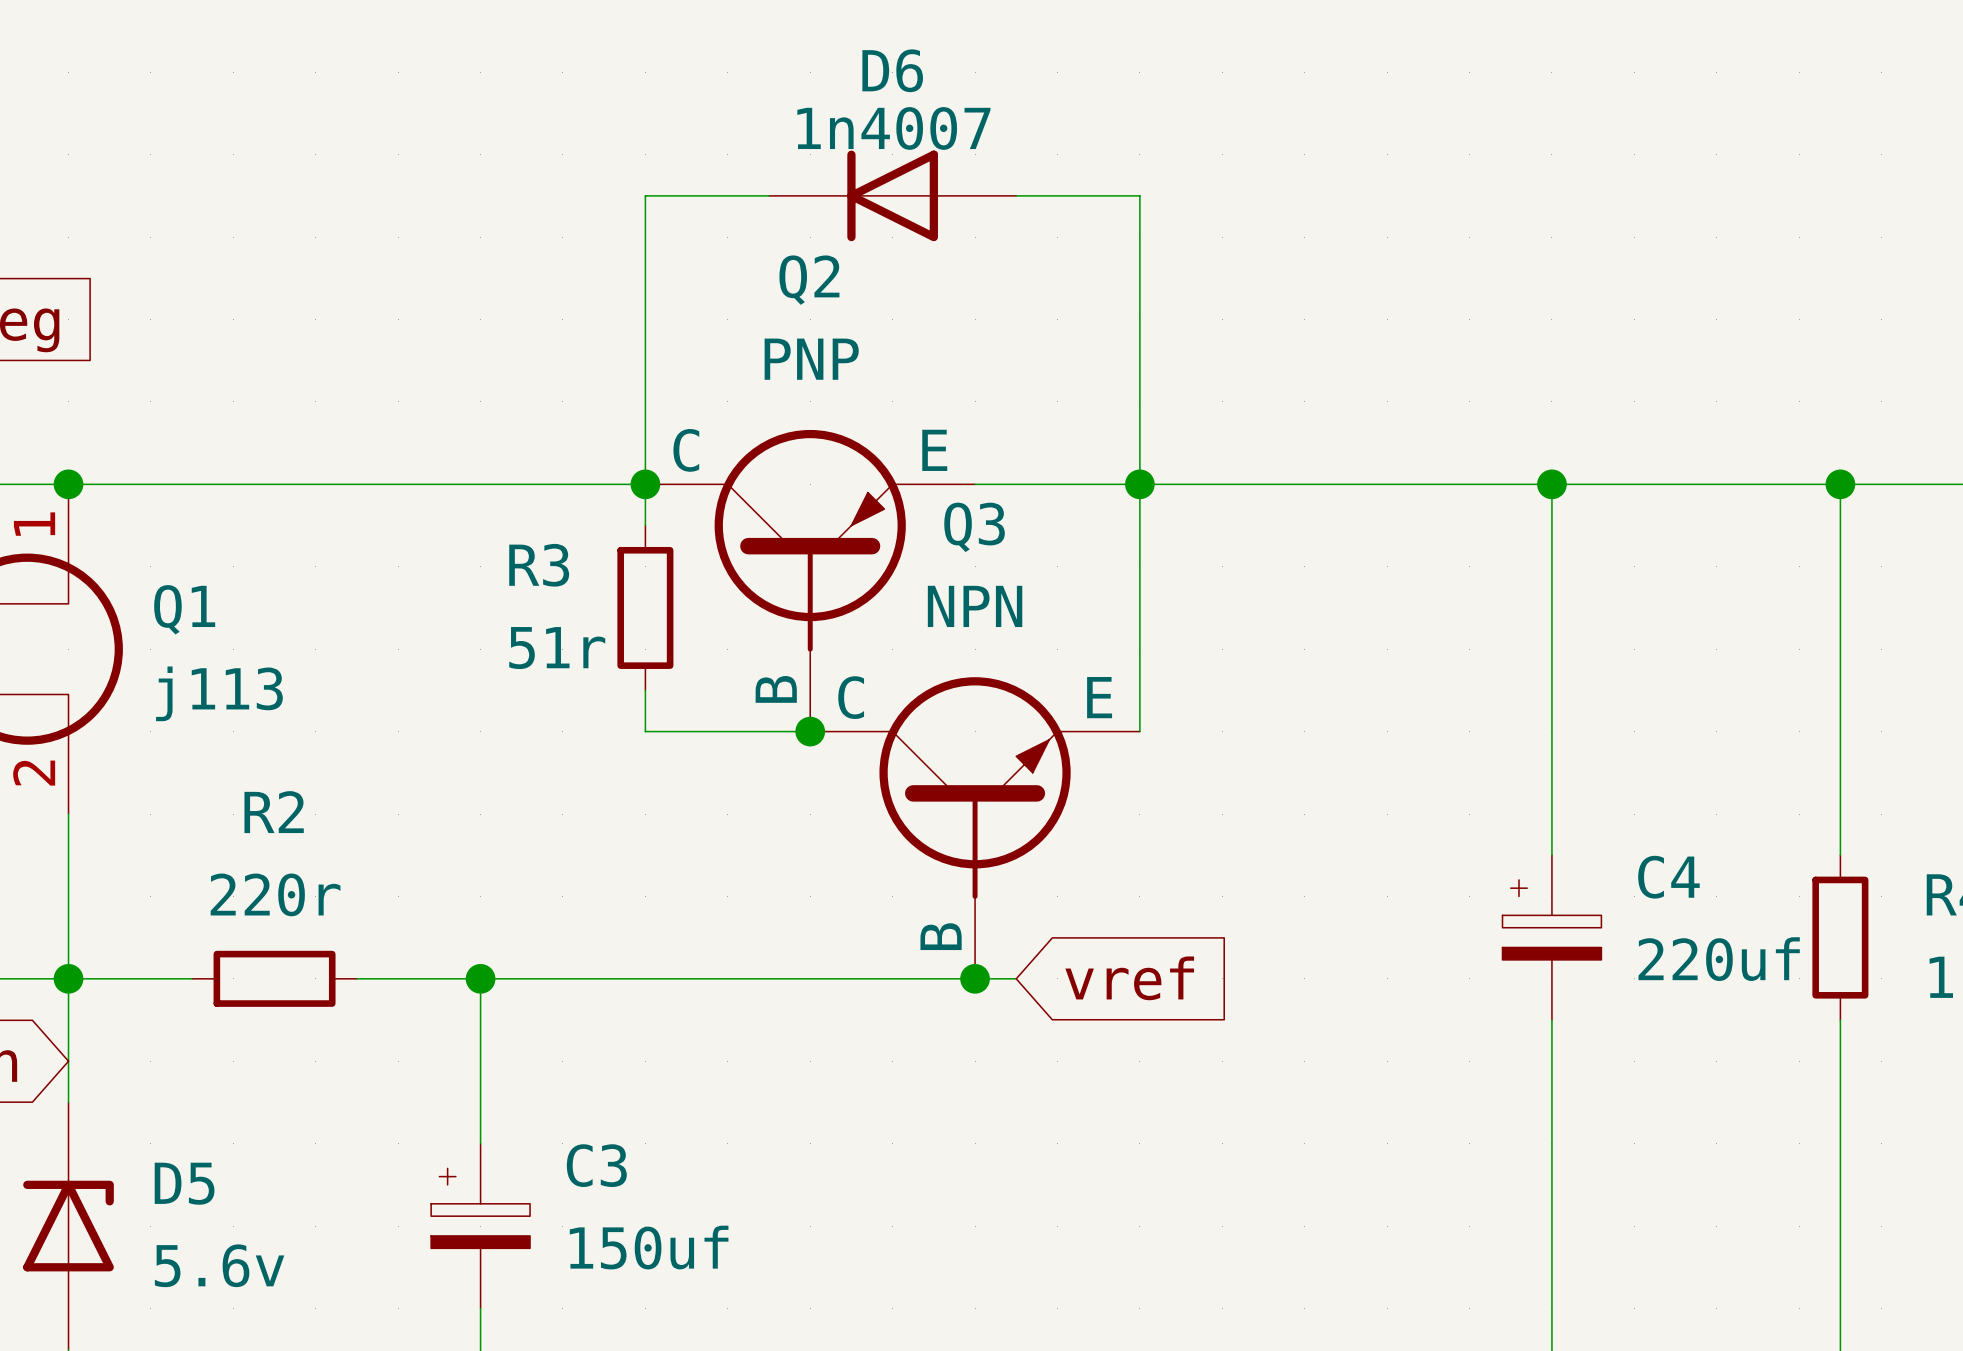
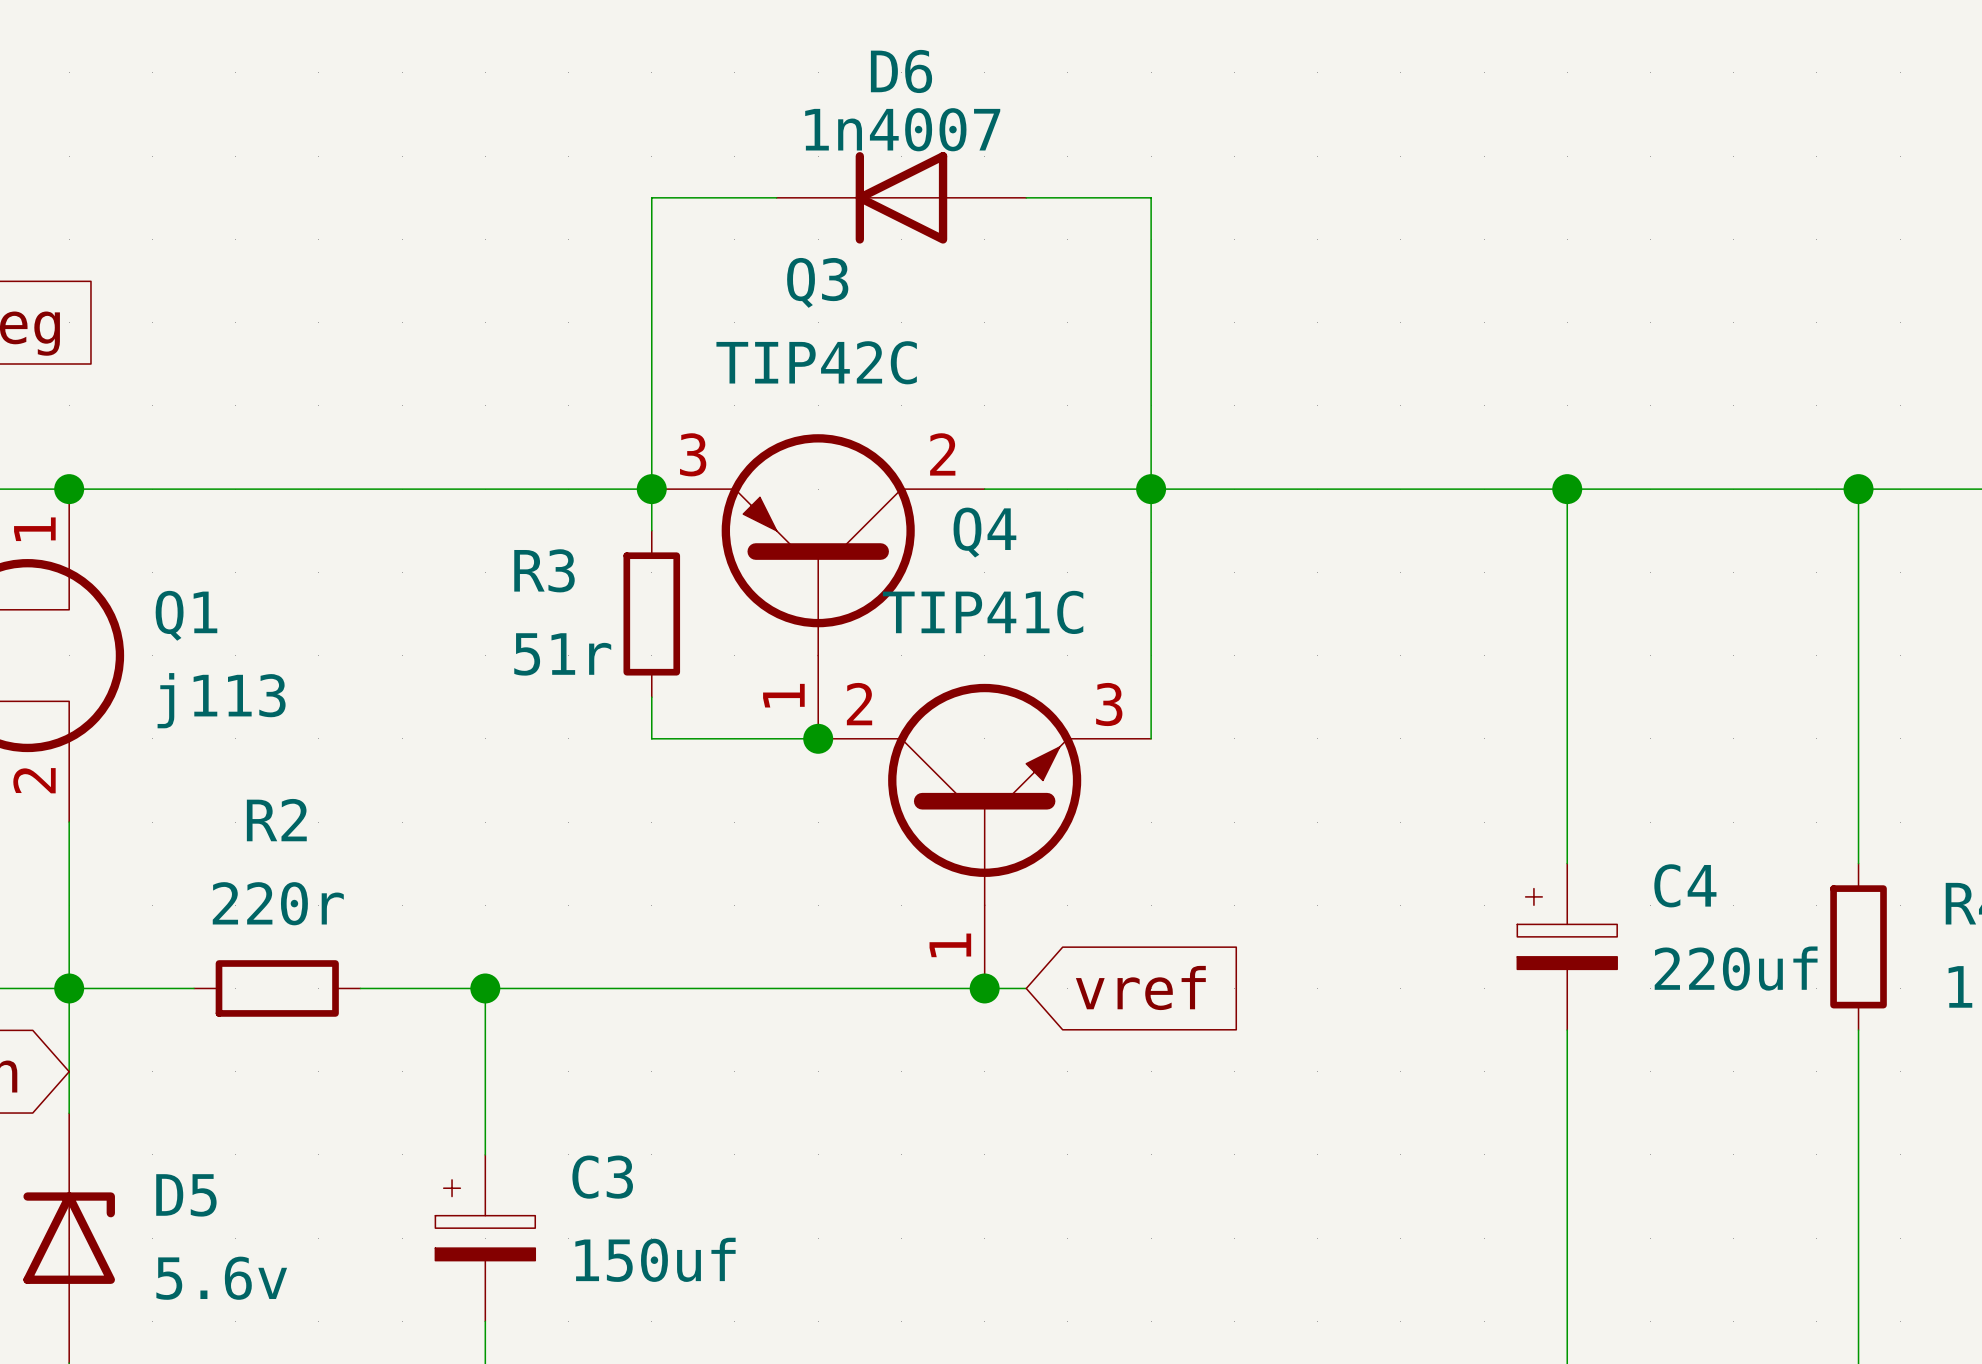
Q2: PNP (810, 580) -> none
Q3 value: NPN (975, 606) -> TIP42C (816, 362)
Q3 symbol: [810, 677, 1140, 979] -> [651, 434, 985, 739]
Q4: none -> TIP41C (984, 836)

